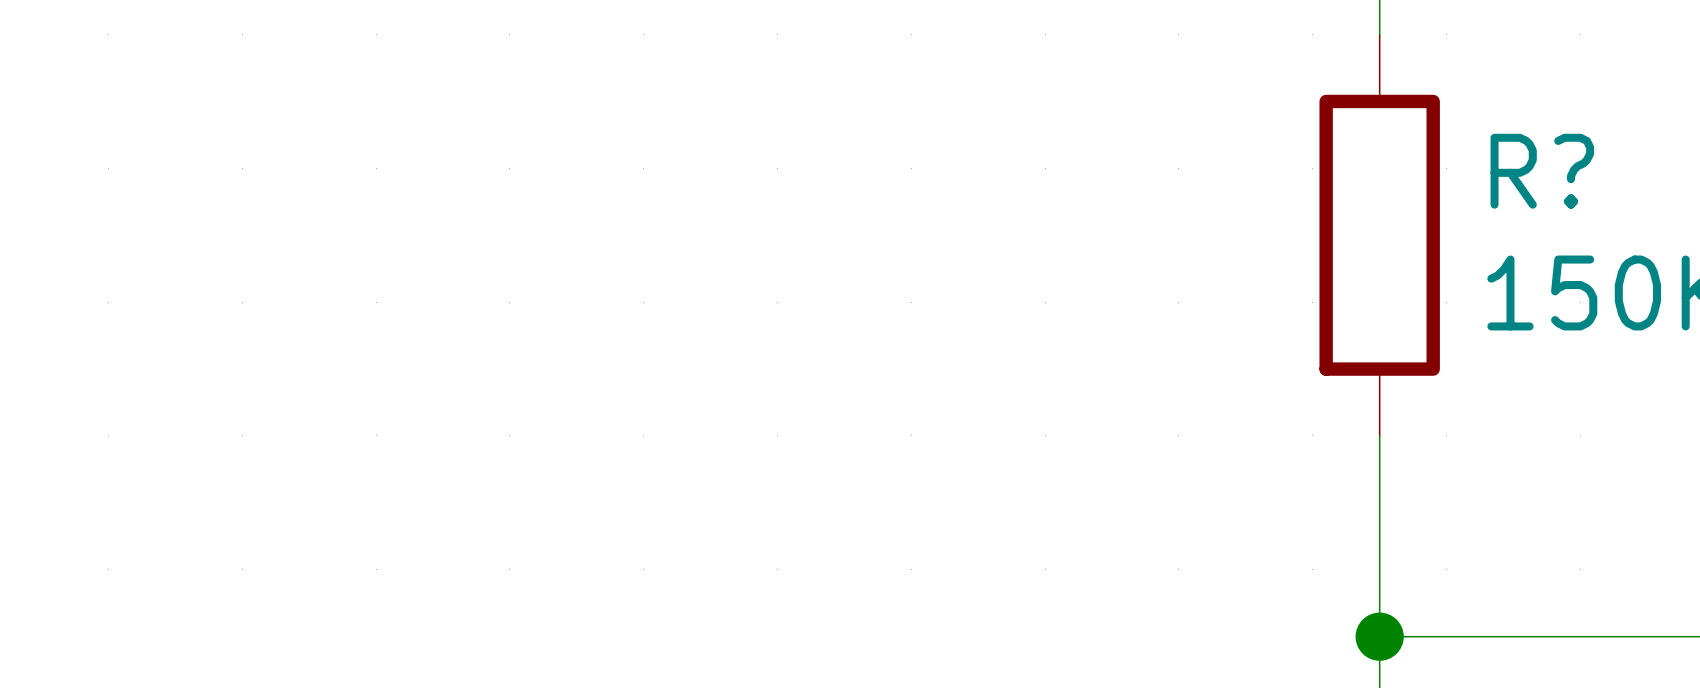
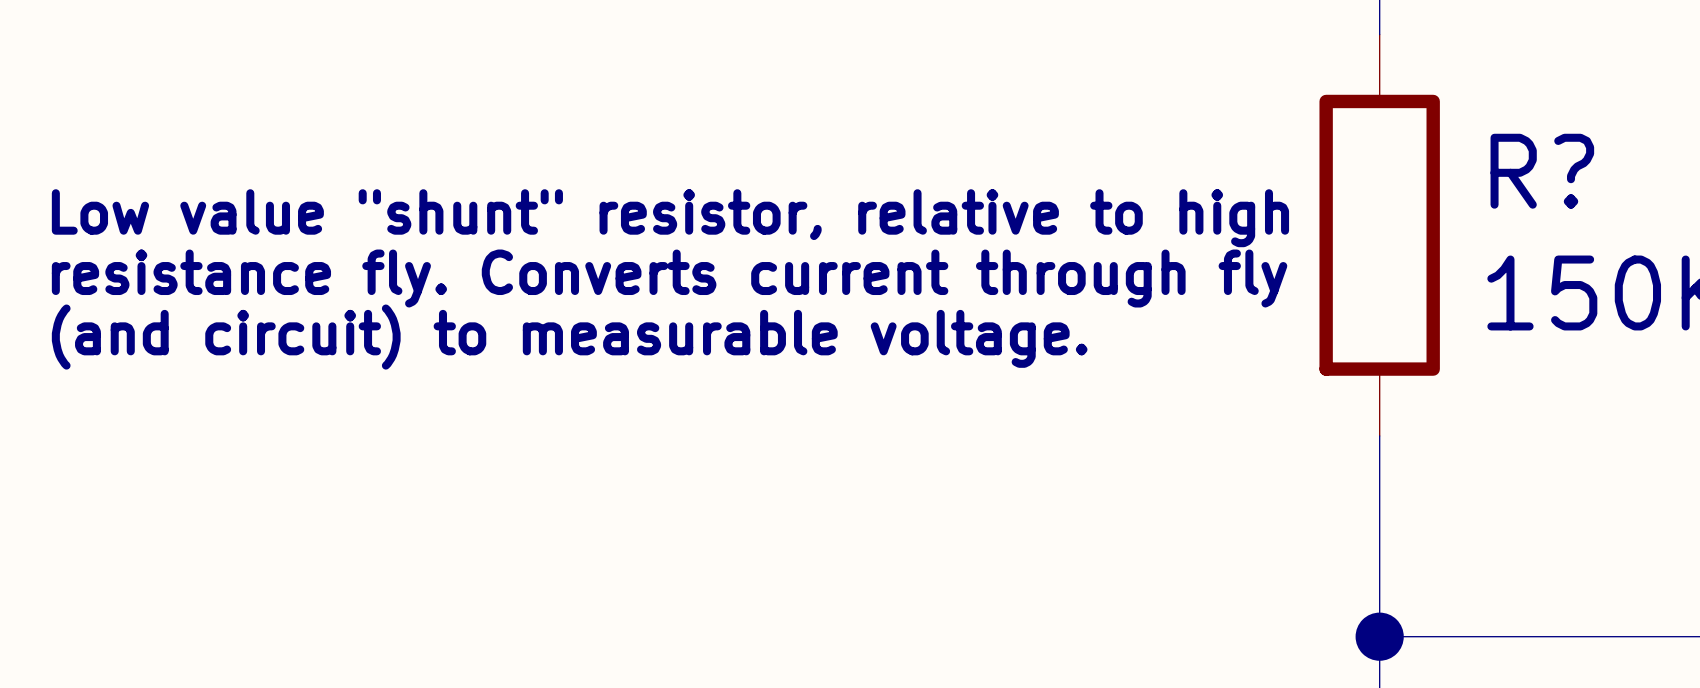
text: none -> Low value "shunt" resistor, relative to high (670, 218)
text: none -> resistance fly. Converts current through fly (669, 278)
text: none -> (and circuit) to measurable voltage. (569, 337)

